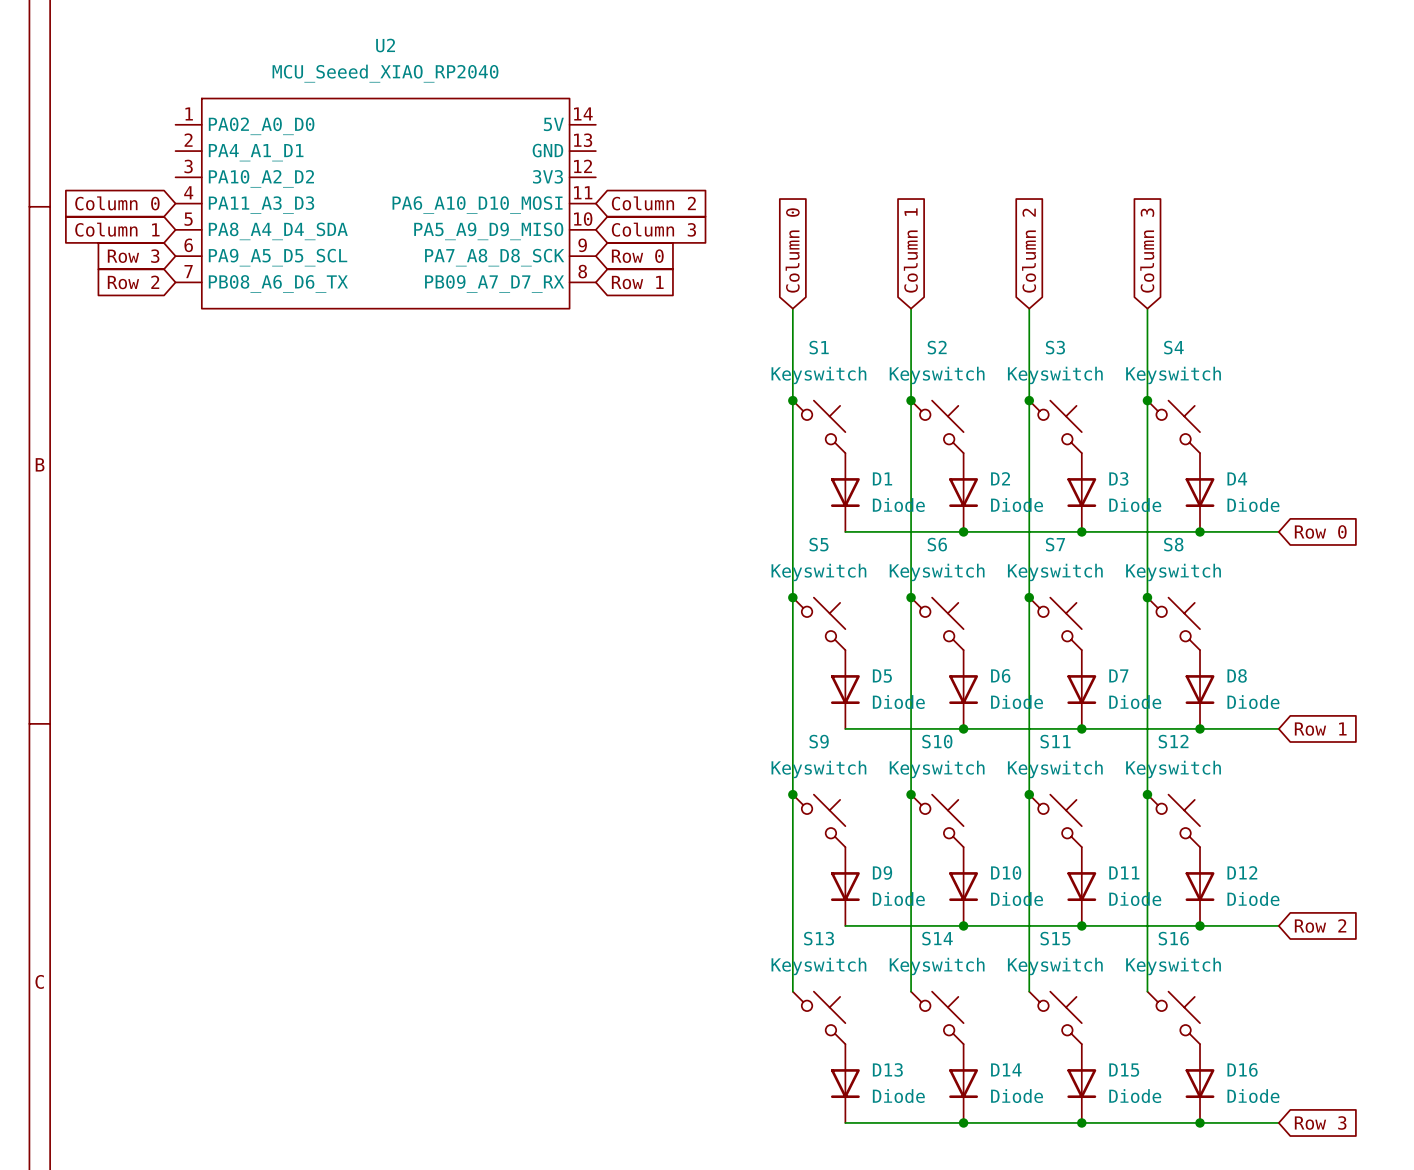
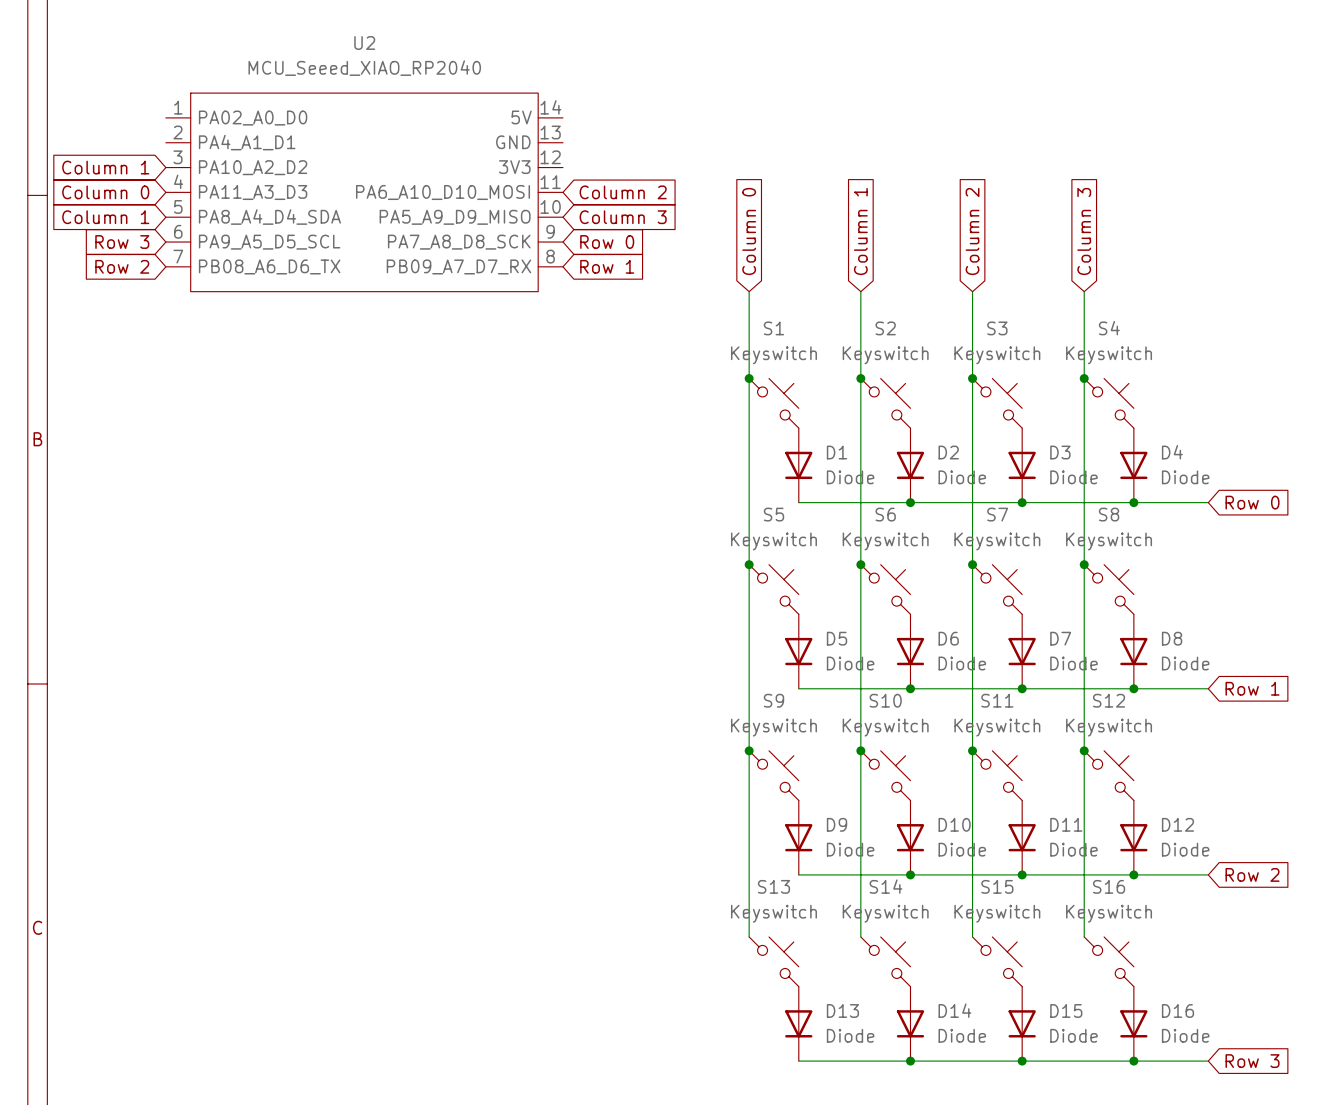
global label: none -> Column 1 (105, 167)

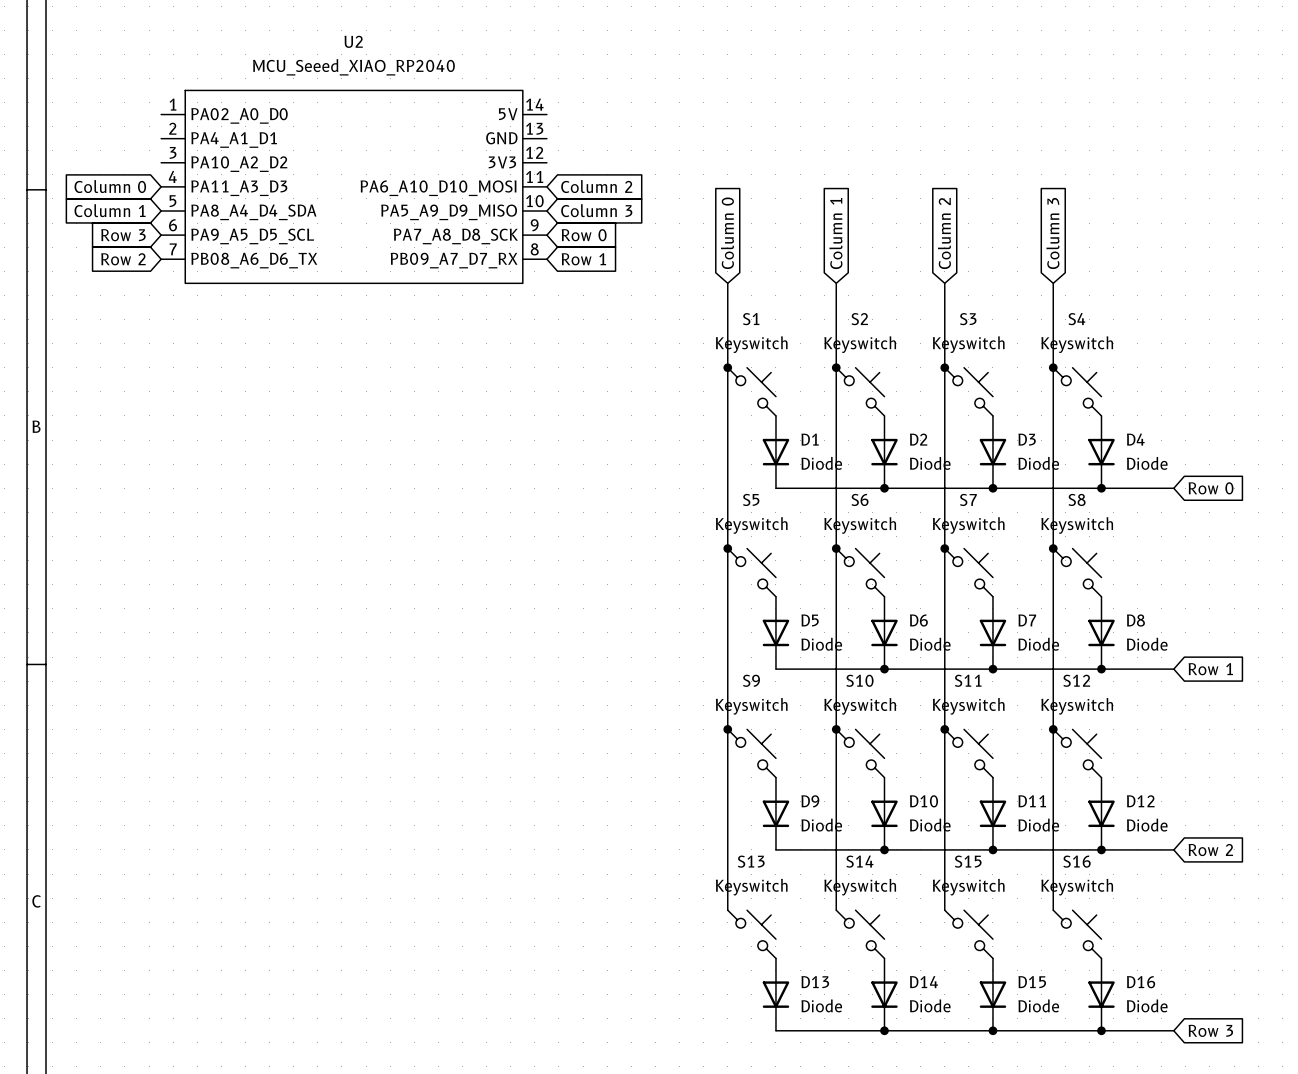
global label: Column 1 (105, 167) -> none

